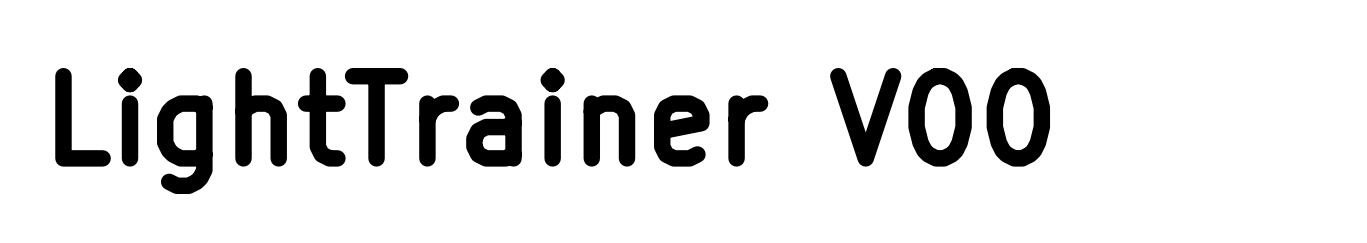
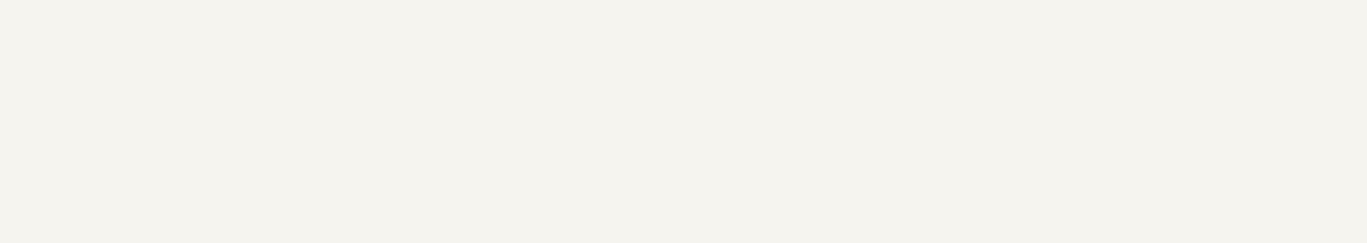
text: LightTrainer V00 (552, 130) -> none

